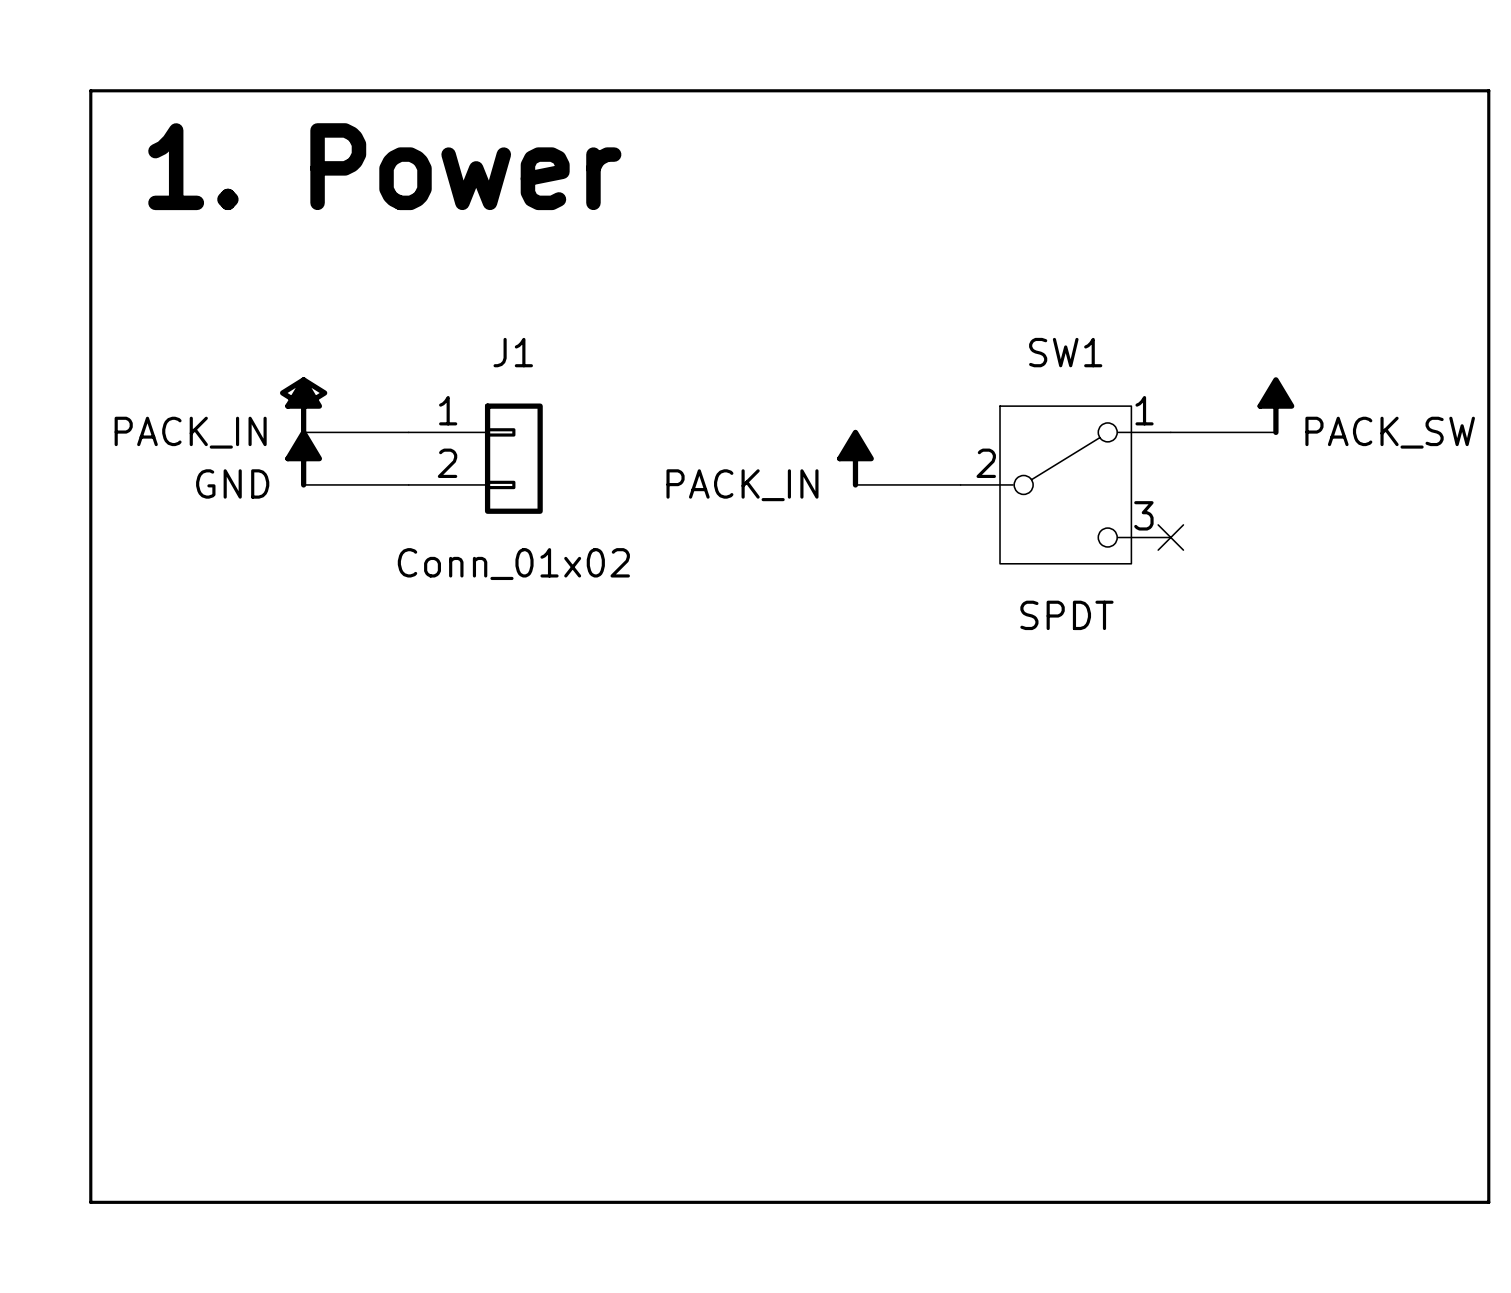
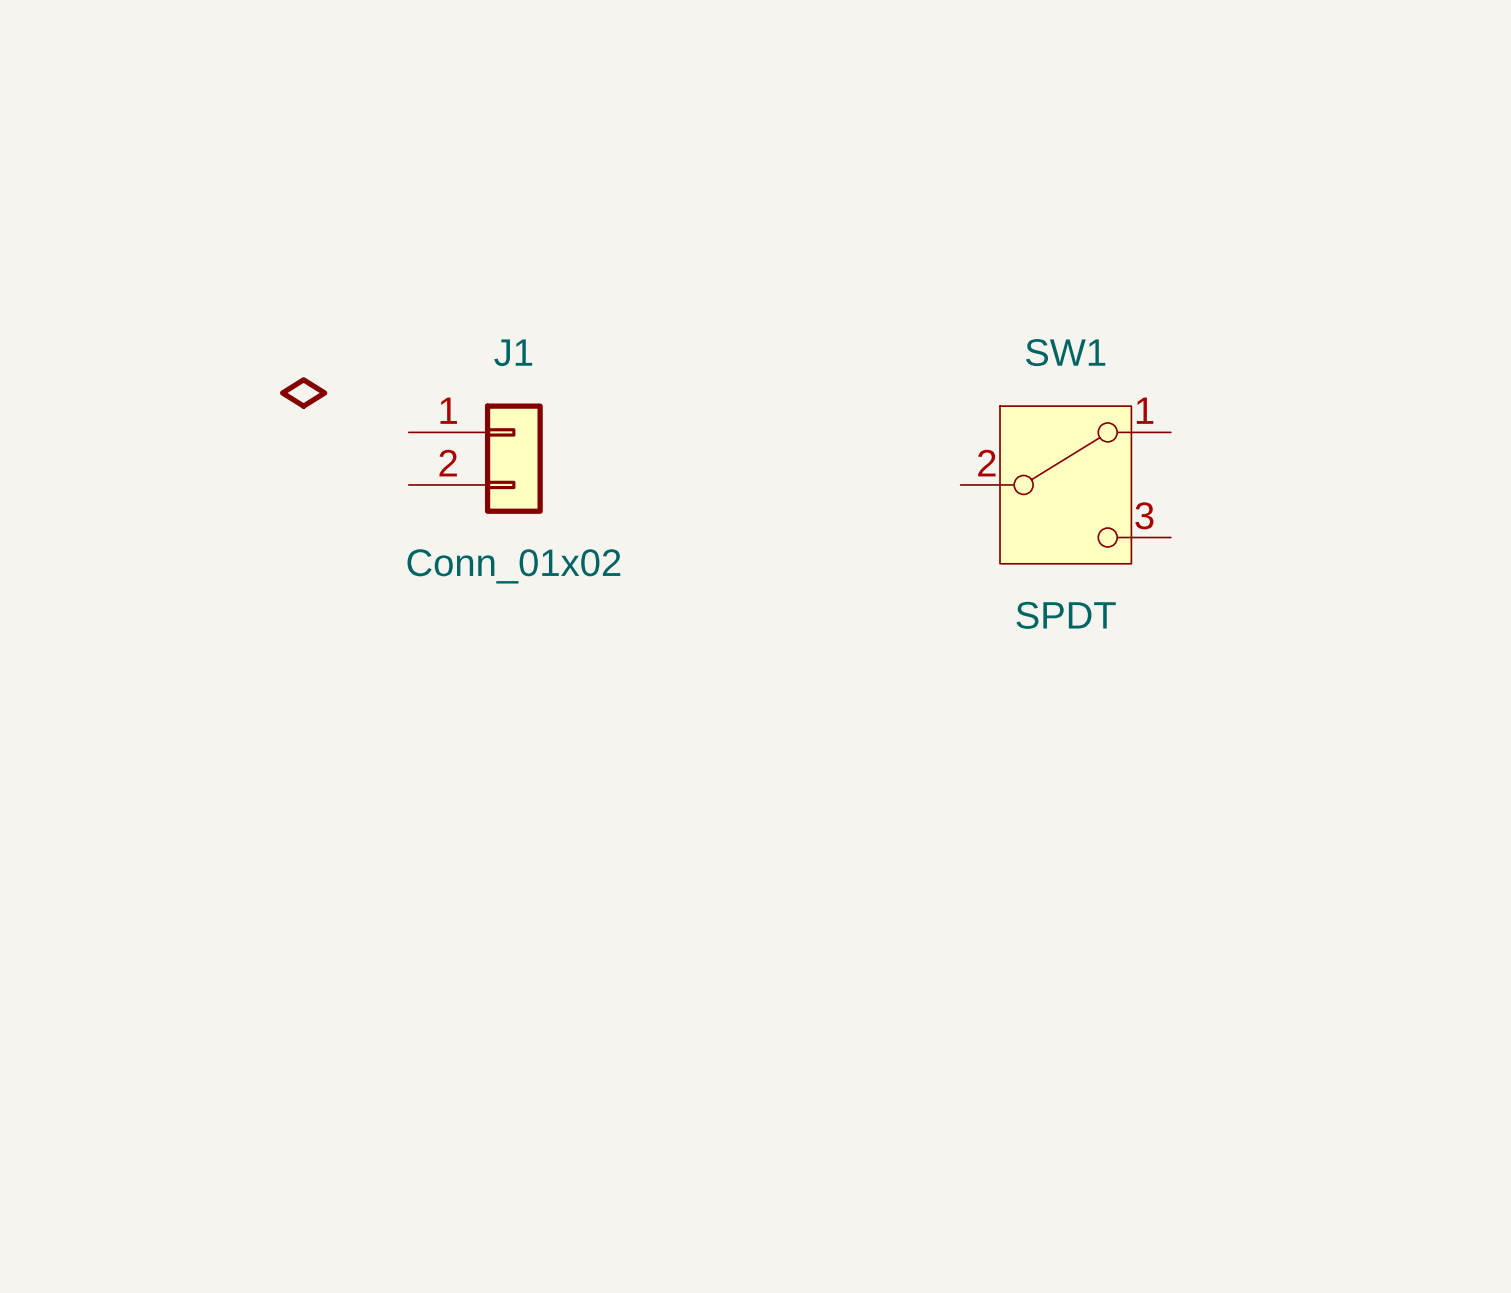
line: (90, 90) (1488, 90) (1488, 1202) (90, 1202) (90, 90) -> none
text: 1. Power (384, 166) -> none
power symbol: PACK_IN (303, 406) -> none
power symbol: PACK_SW (1275, 406) -> none
wire: (303, 432) (408, 432) -> none
wire: (1170, 432) (1275, 432) -> none
power symbol: GND (303, 458) -> none
power symbol: PACK_IN (855, 458) -> none
wire: (303, 484) (408, 484) -> none
wire: (855, 484) (960, 484) -> none
no-connect mark: (1170, 537) -> none

